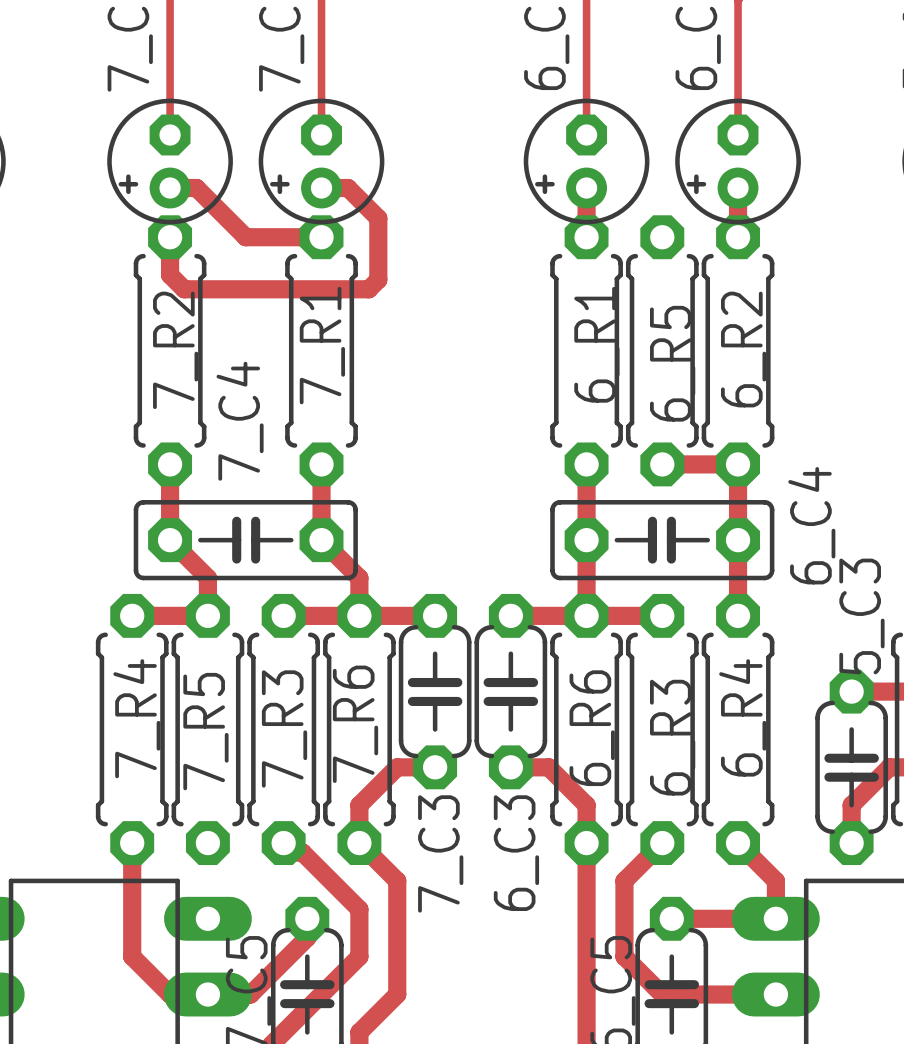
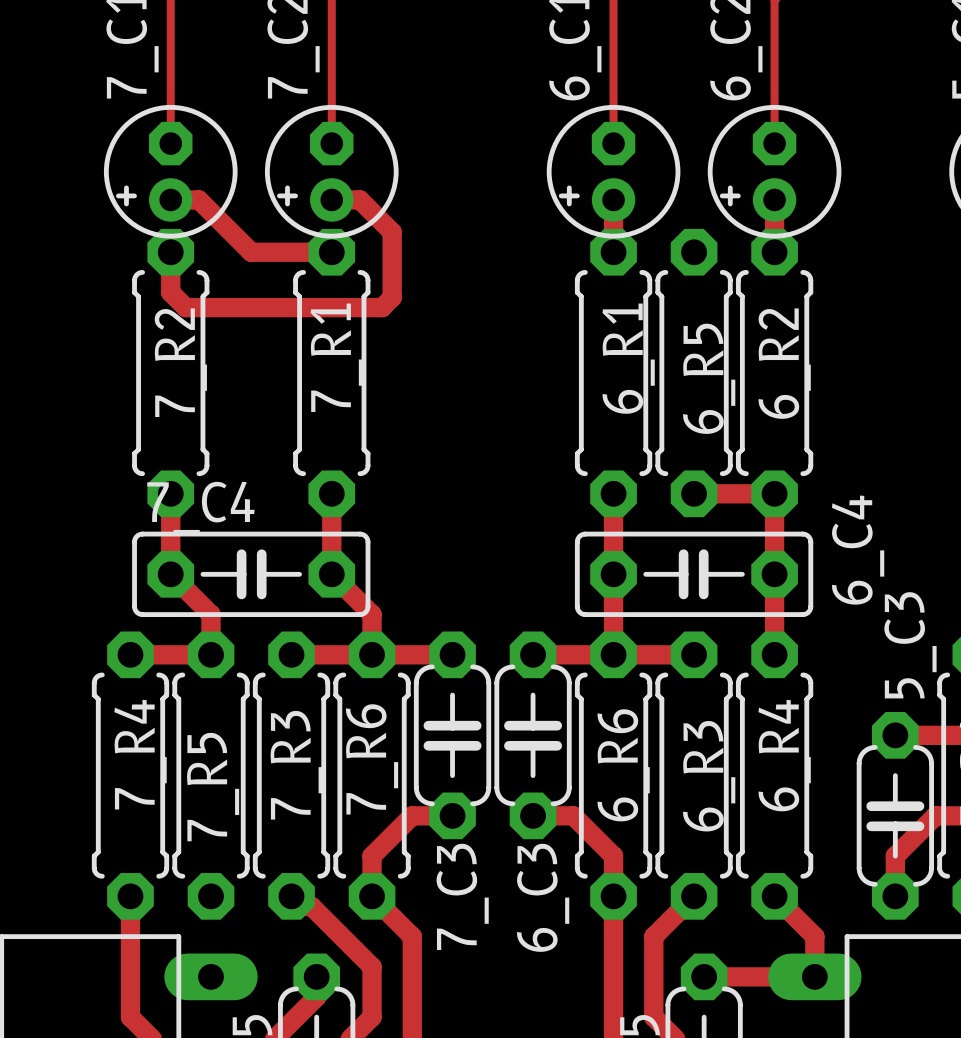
7_C4 name rotation: 0° (240, 421) -> 90° clockwise (200, 507)

